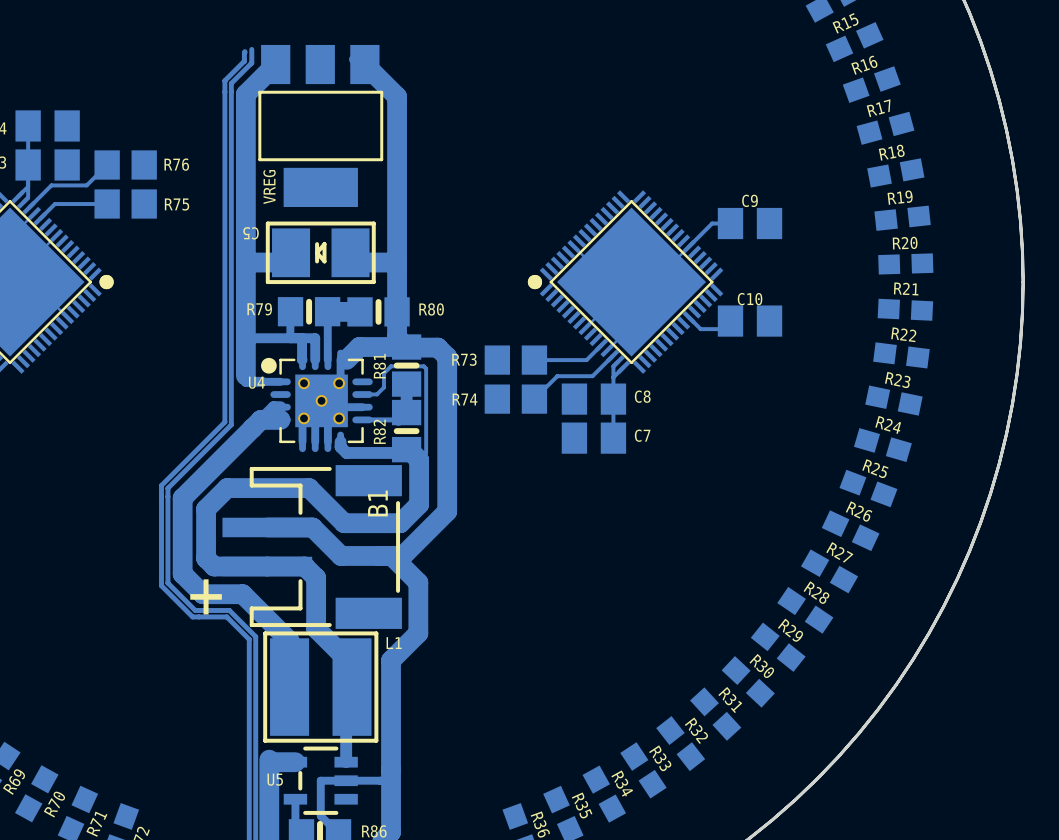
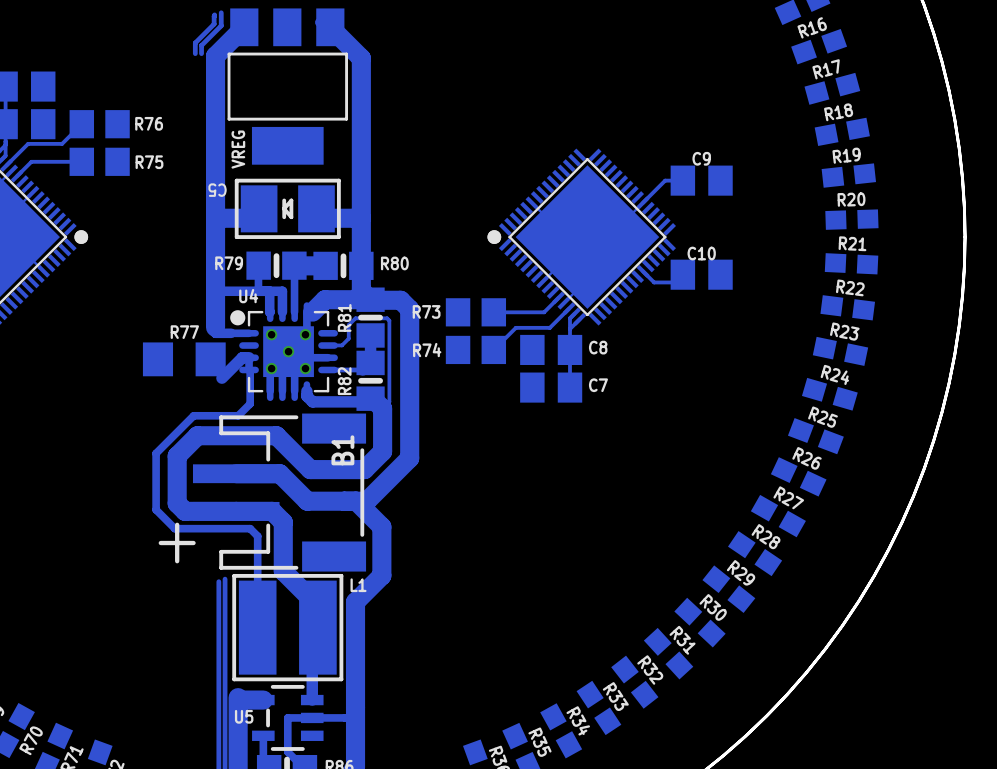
track: (224, 91) (224, 422) (161, 485) (161, 585) (192, 616) (226, 616) (249, 639) -> none
track: (231, 91) (231, 424) (167, 488) (167, 583) (195, 610) (229, 610) (255, 636) -> none
U4 name position: U4 (256, 382) -> U4 (248, 296)
R77: none -> (184, 359)
track: (280, 419) (260, 419) (182, 498) (182, 573) (202, 594) (242, 594) (289, 641) -> (249, 357) (250, 403) (238, 415) (193, 415) (156, 453) (156, 509) (174, 528) (250, 528) (257, 536) (257, 583)

